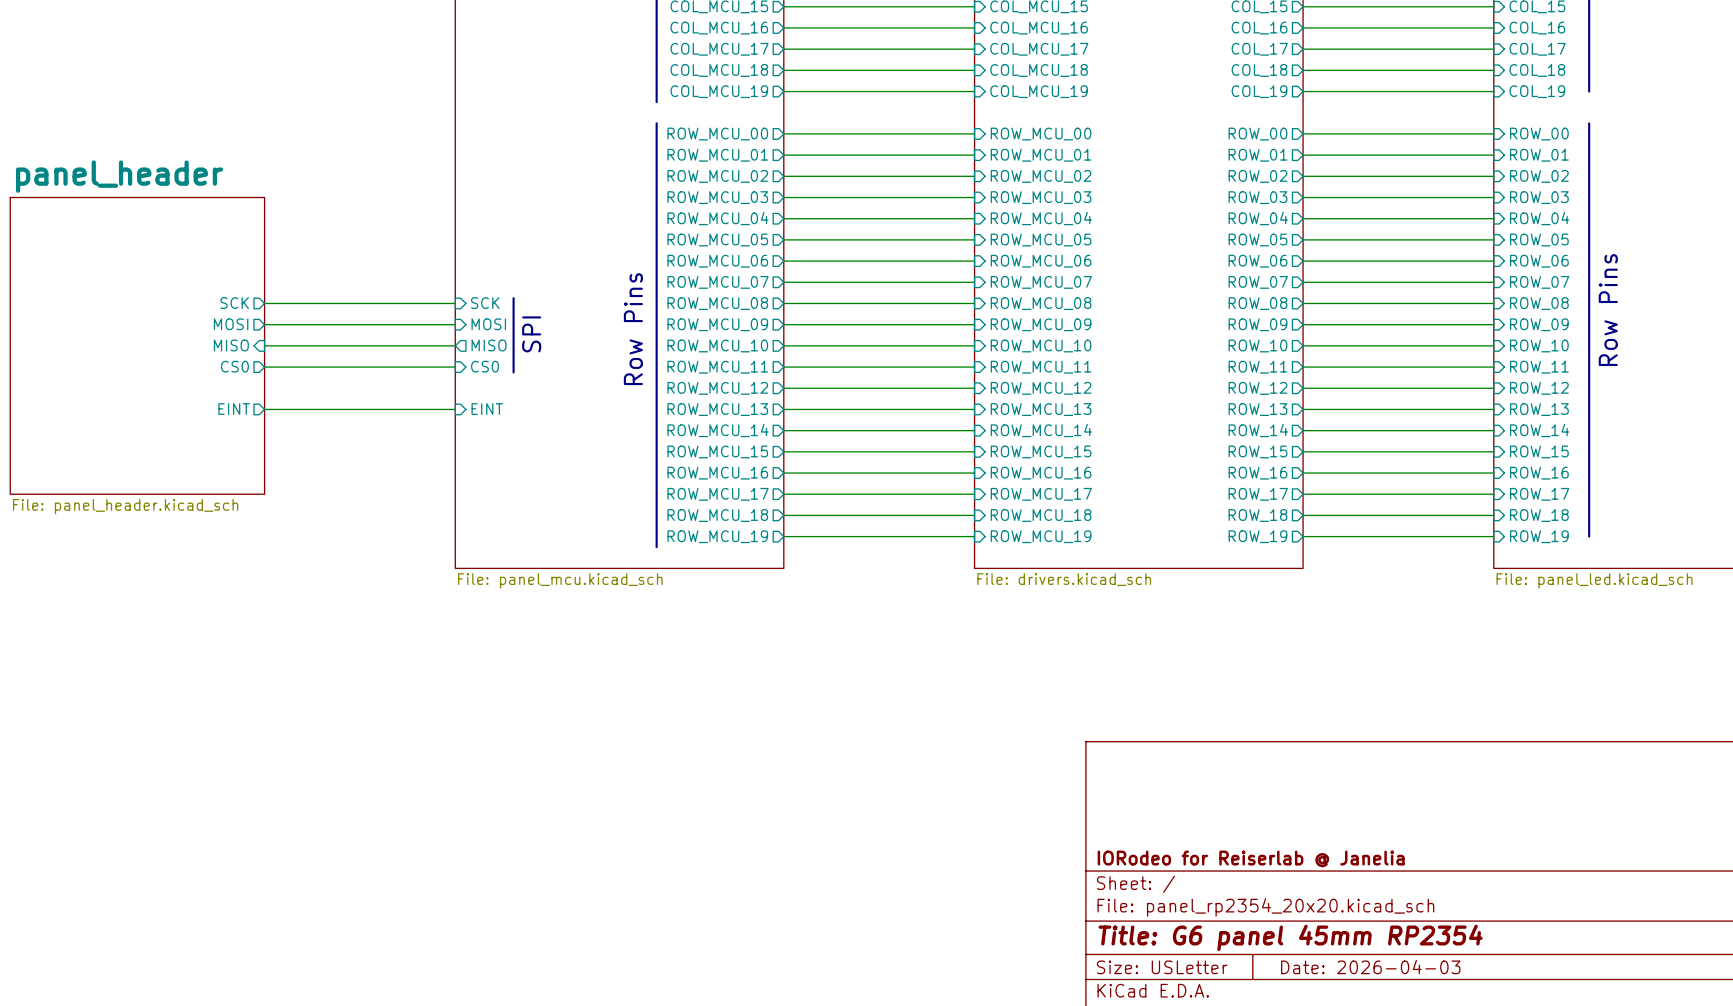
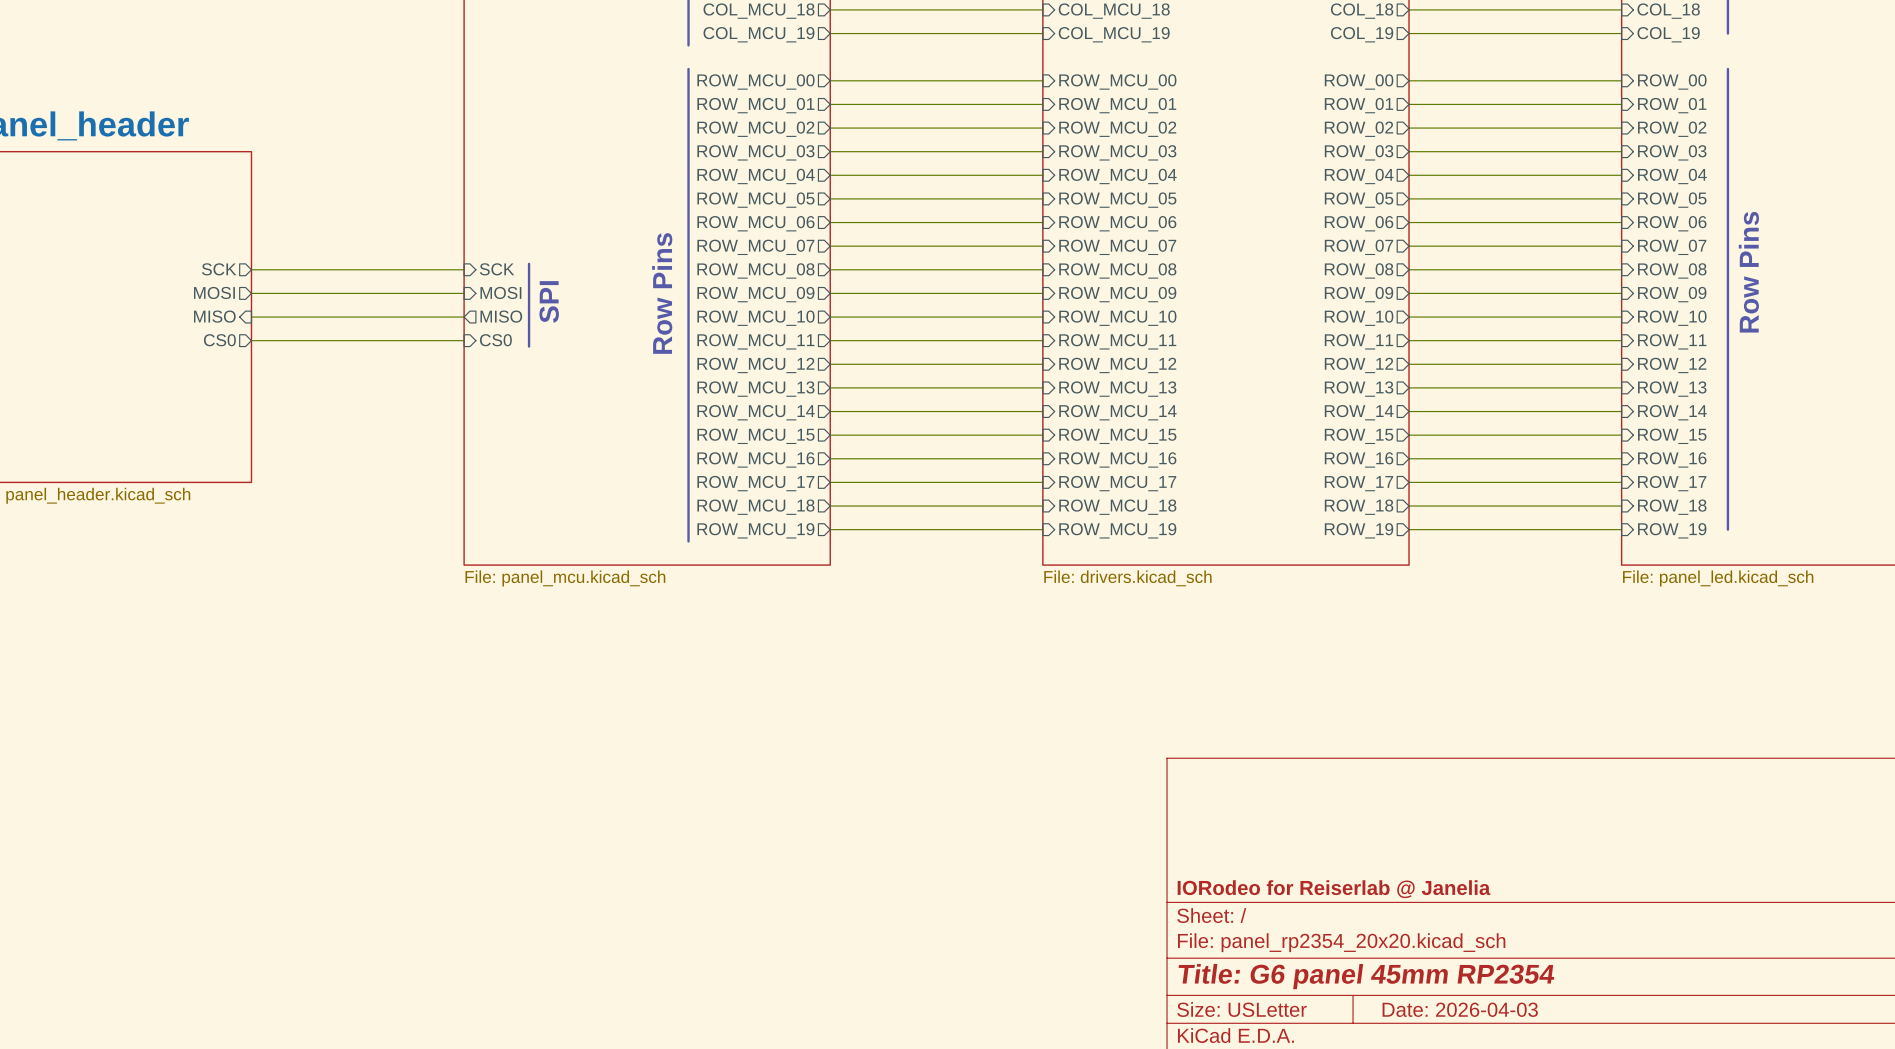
sheet pin: EINT (234, 409) -> none
wire: (264, 409) (455, 409) -> none
sheet pin: EINT (487, 409) -> none

